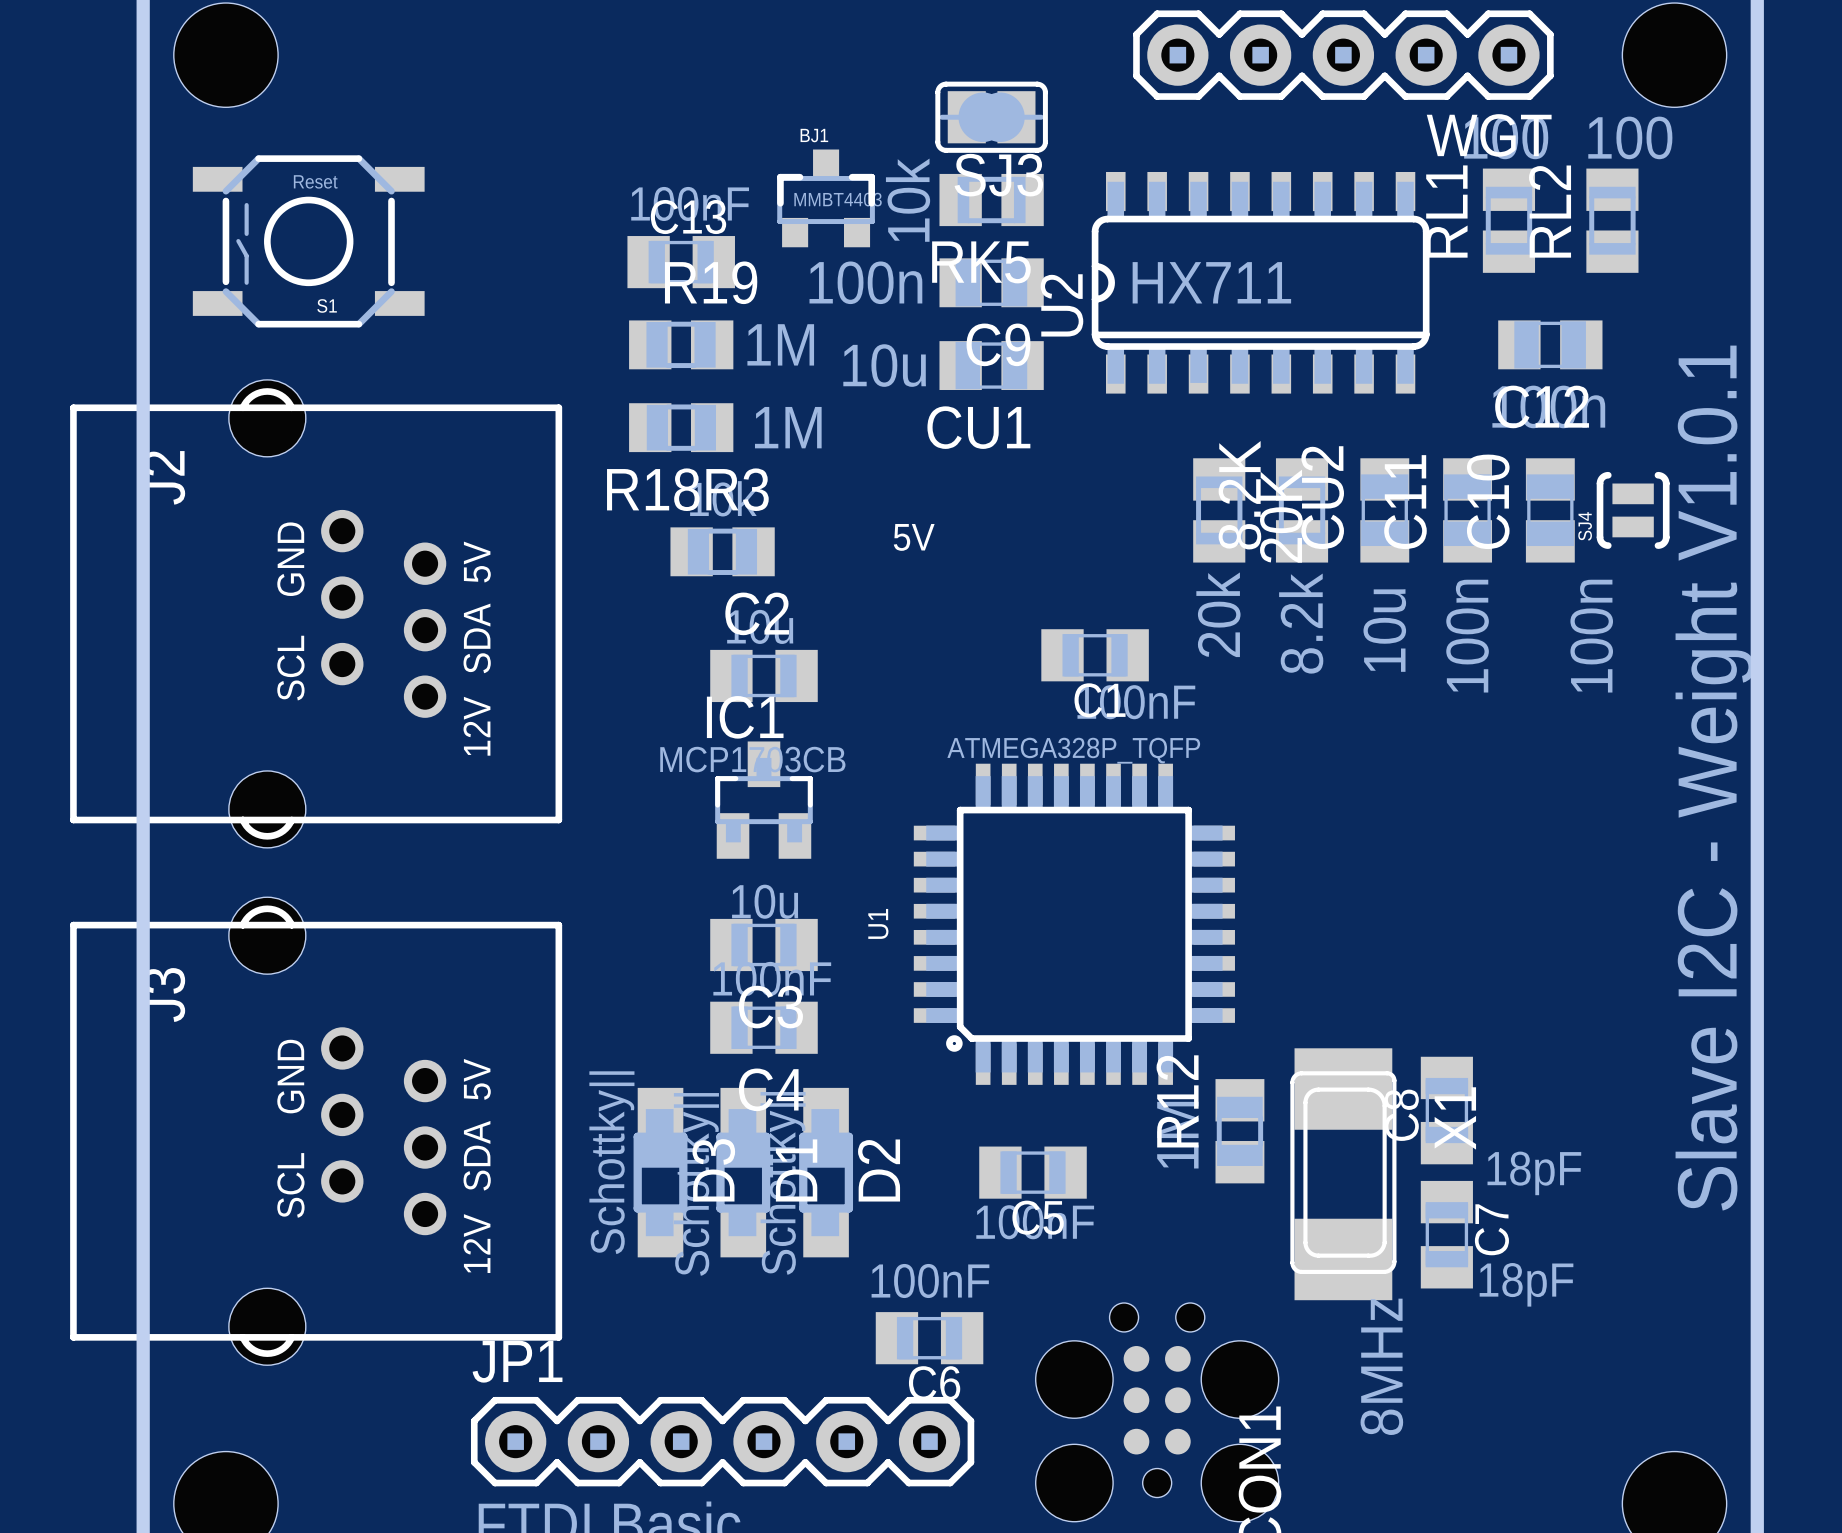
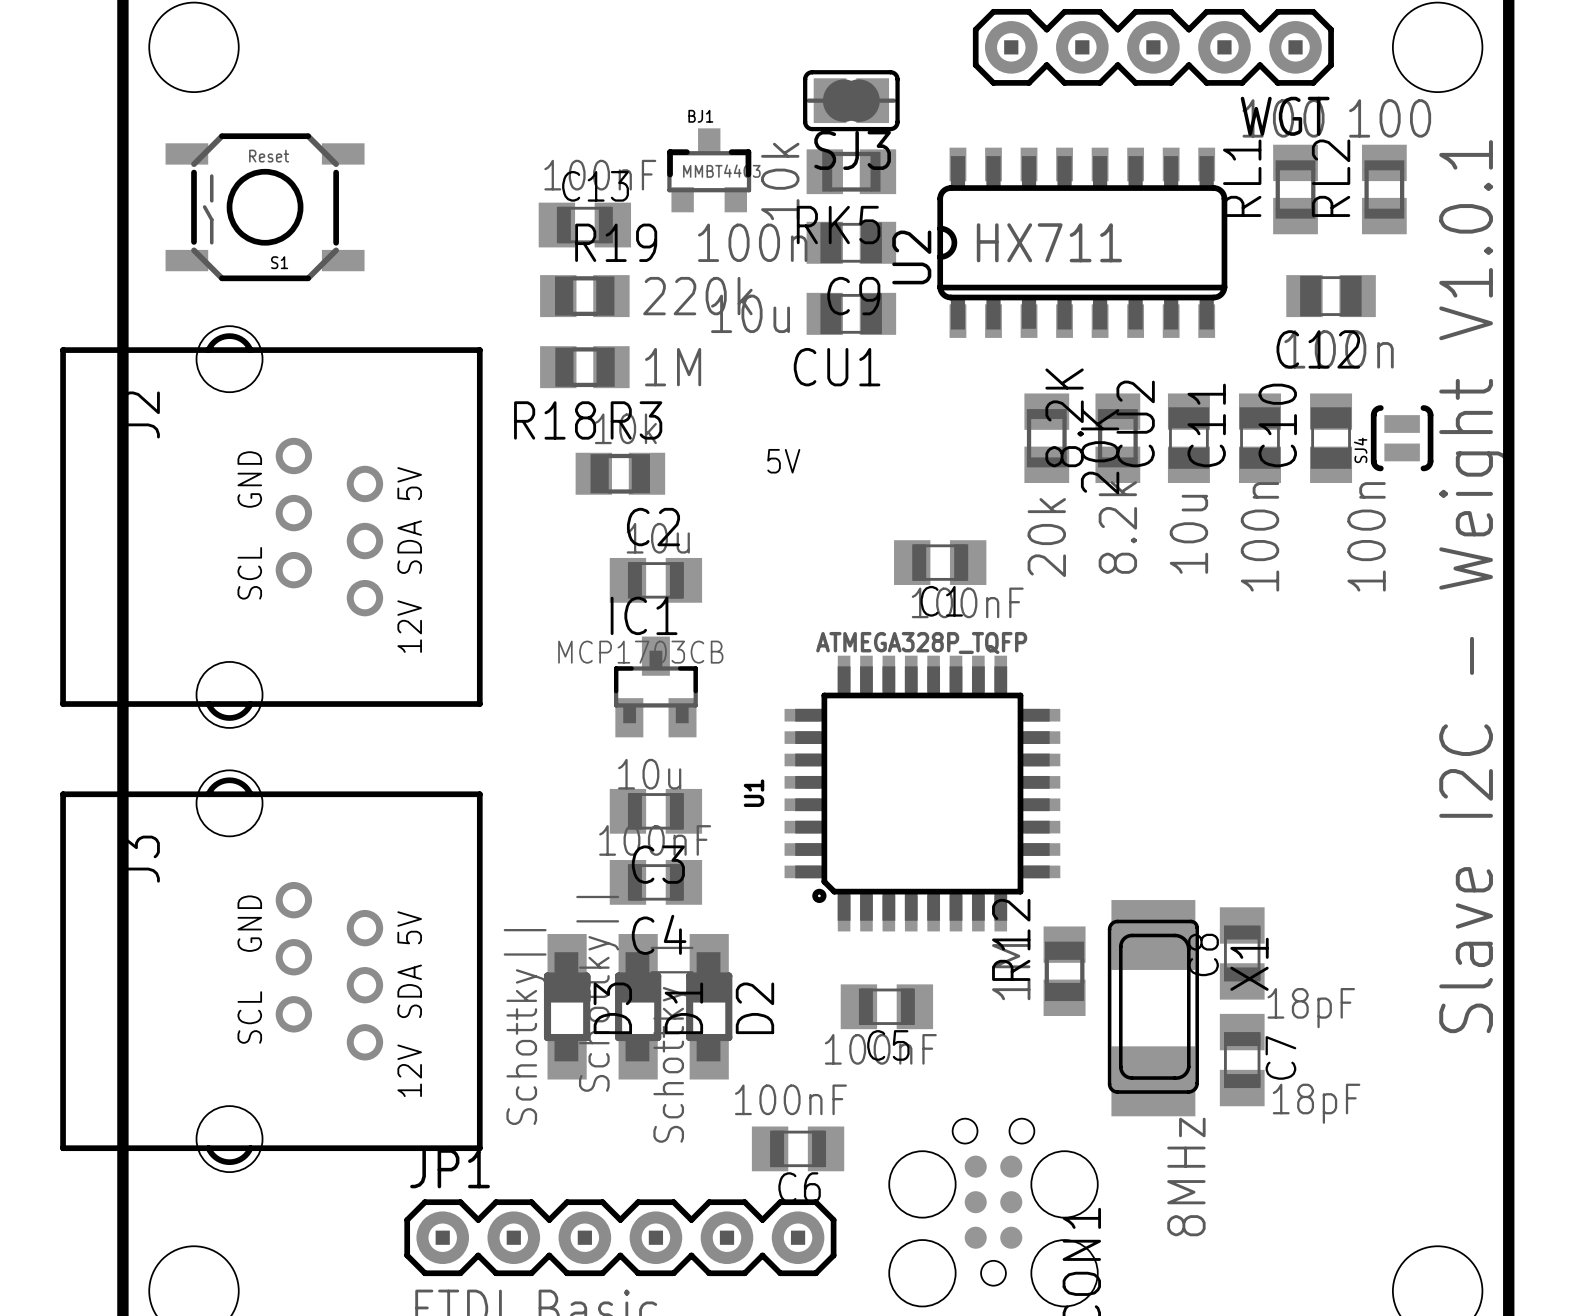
R19 value: 1M (780, 344) -> 220k (697, 296)

